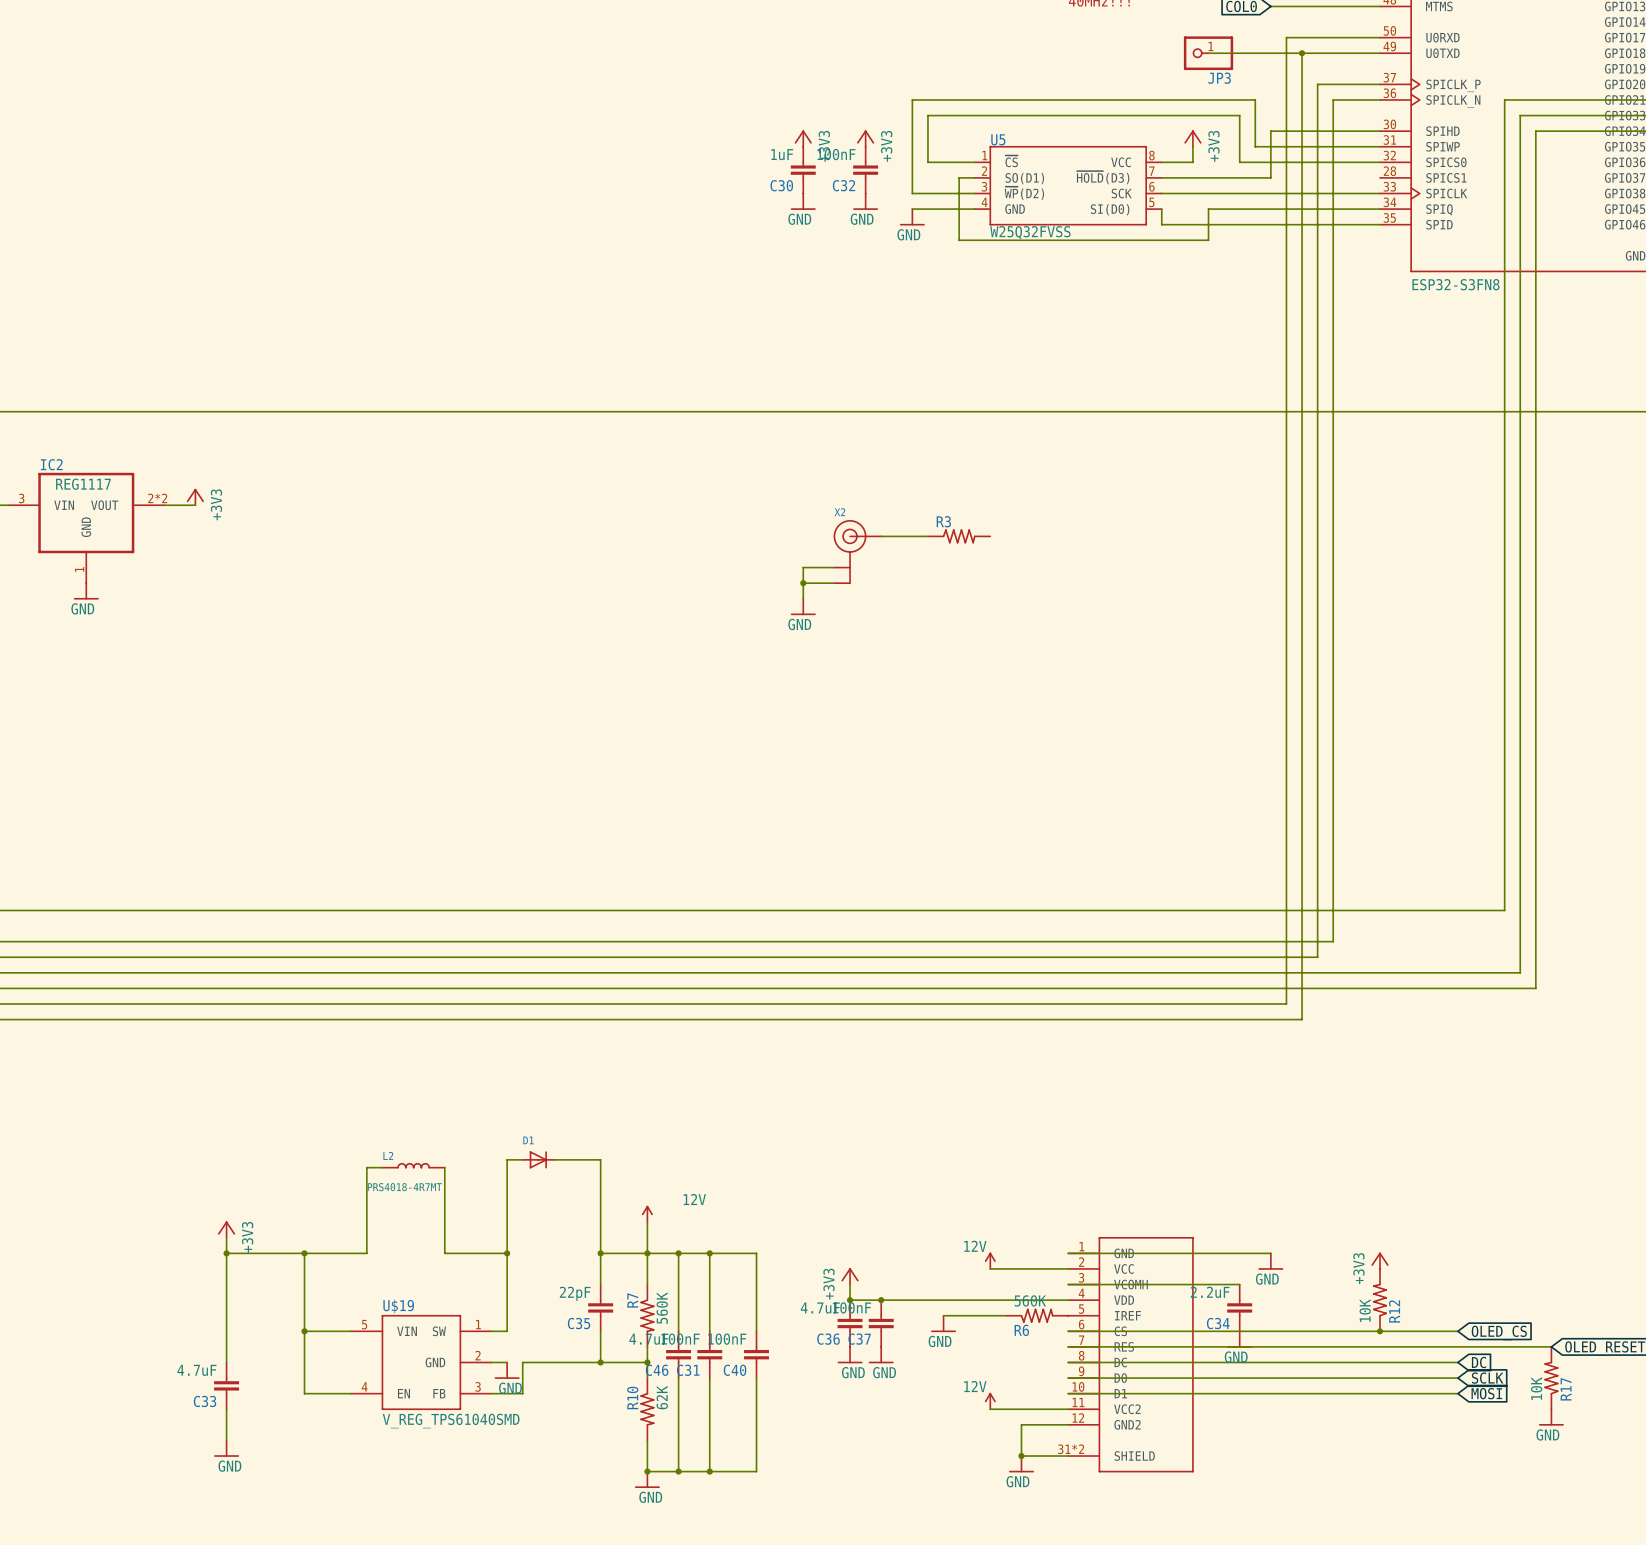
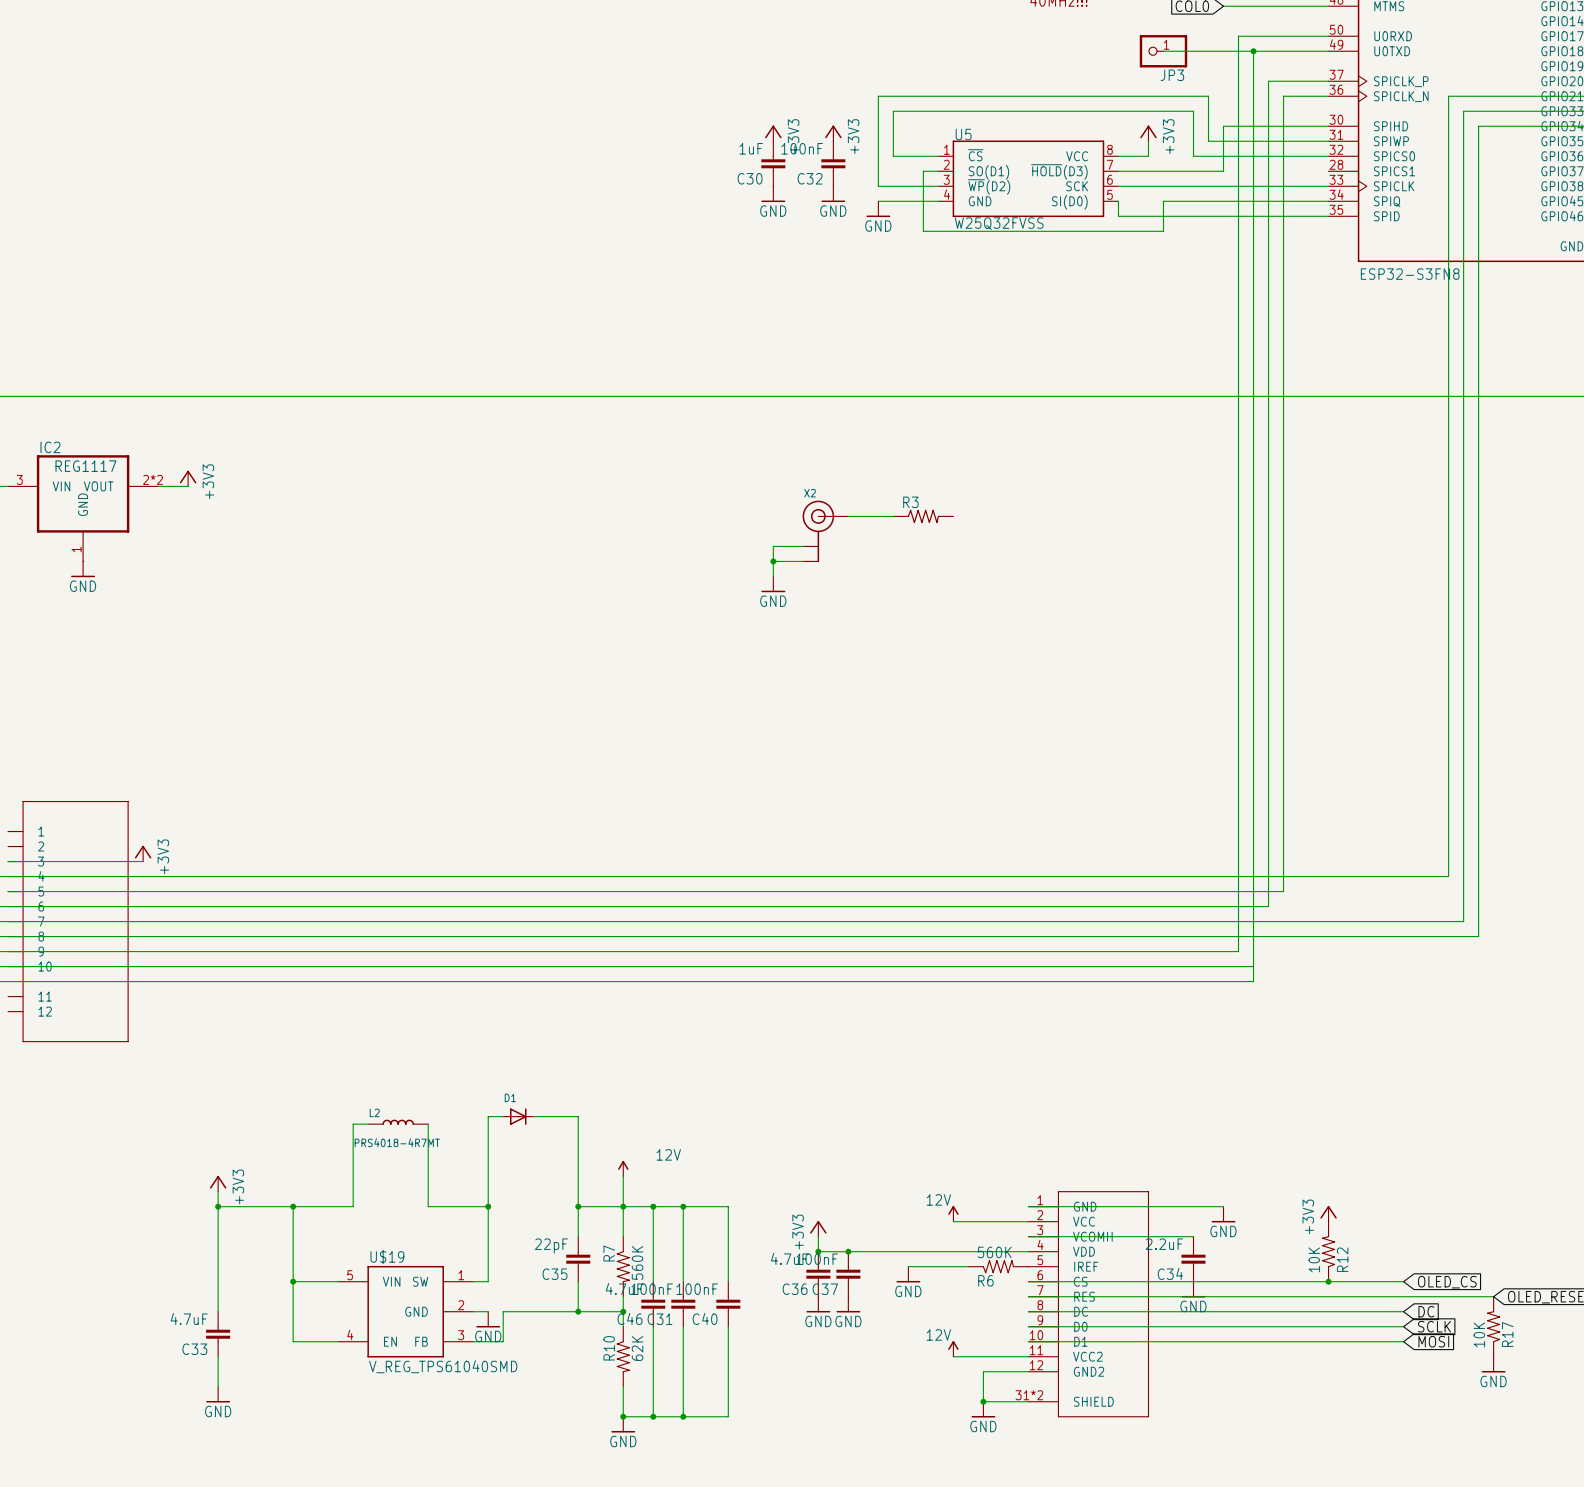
power symbol: none -> +3V3 (143, 853)
wire: none -> (8, 861) (143, 861)
wire: none -> (8, 891) (1283, 891)
wire: (1333, 926) (1333, 941) (1317, 941) (1317, 957) -> (1463, 921) (1268, 921)
part: none -> (68, 921)
wire: (1520, 957) (1520, 972) -> (1478, 936) (1463, 936)
wire: (1535, 972) (1535, 988) (1286, 988) (1286, 1004) -> (1253, 966) (1238, 966)

